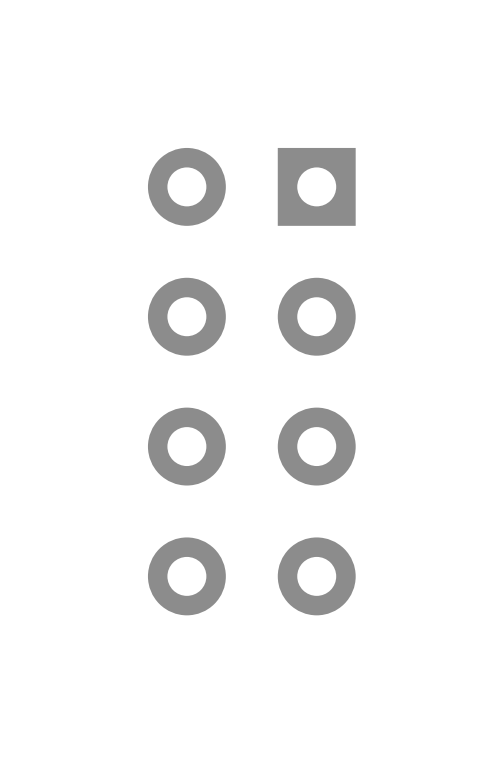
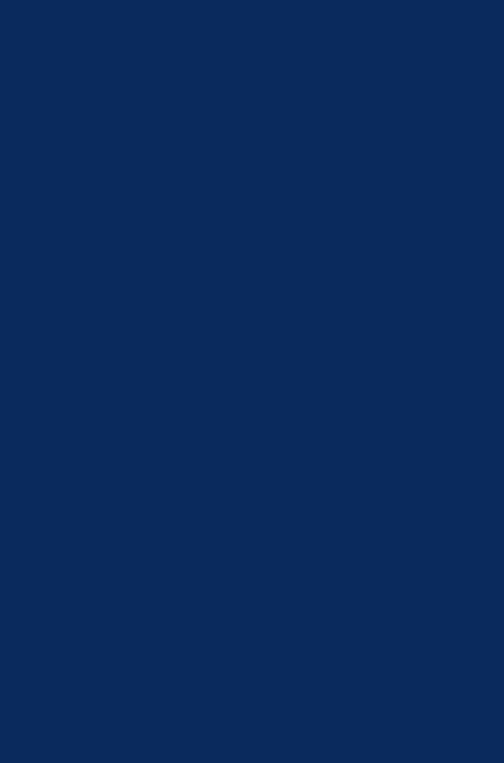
part: (251, 381) -> none

